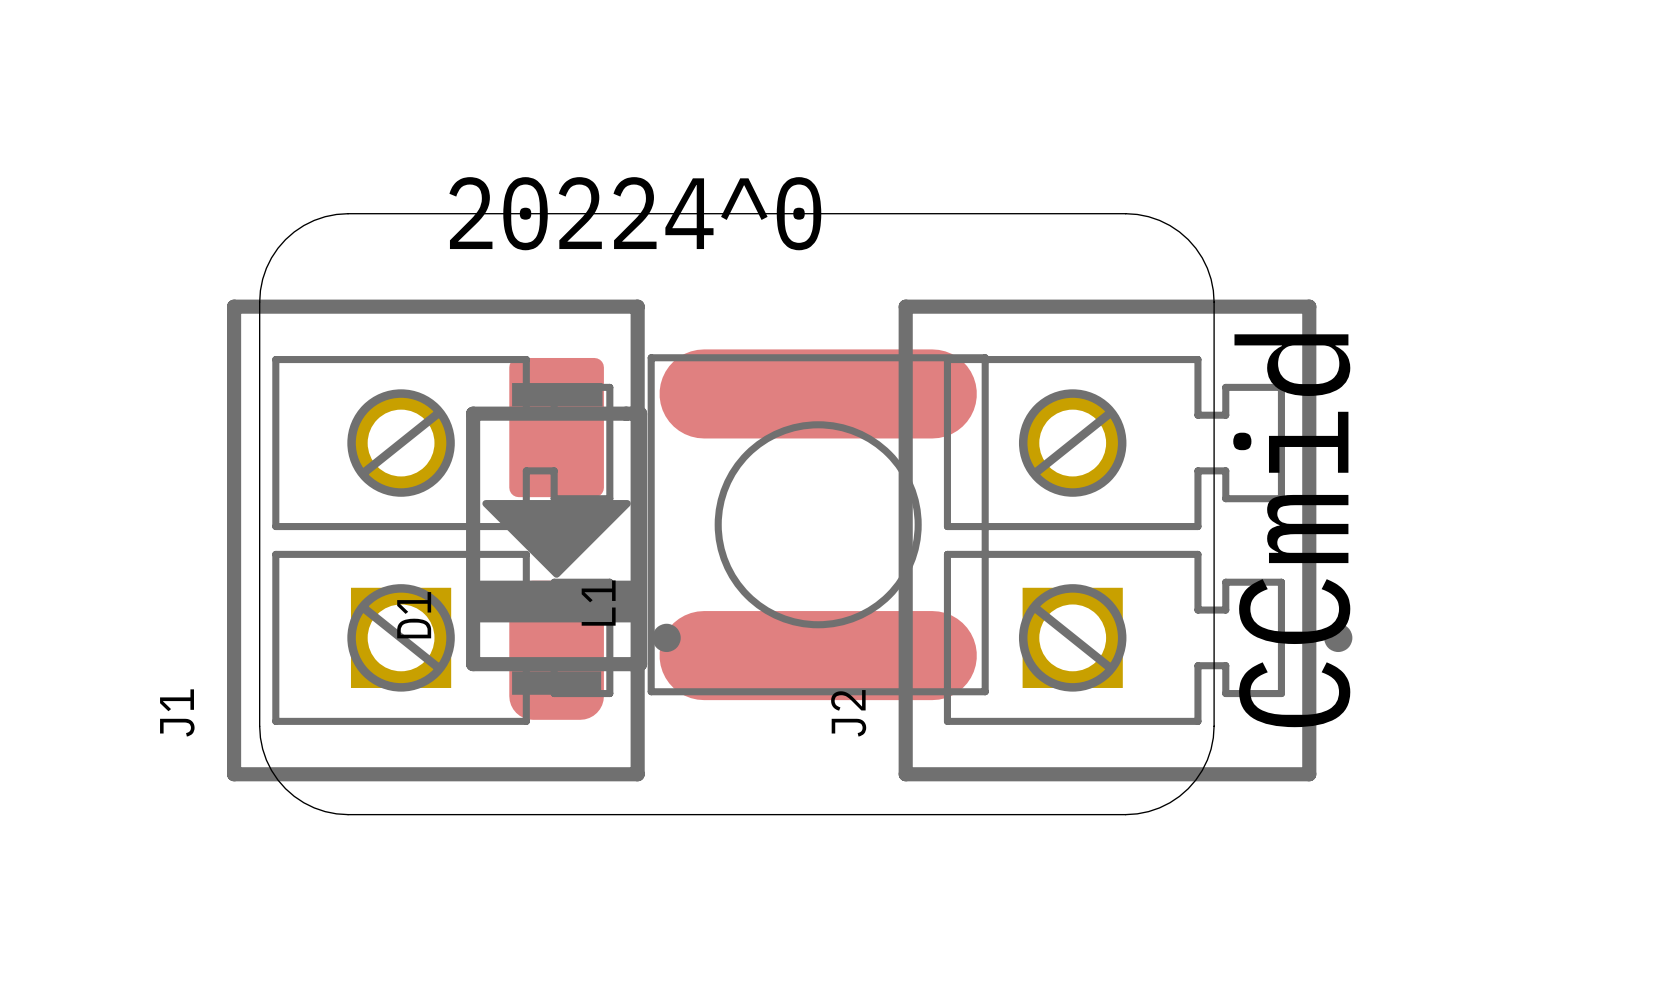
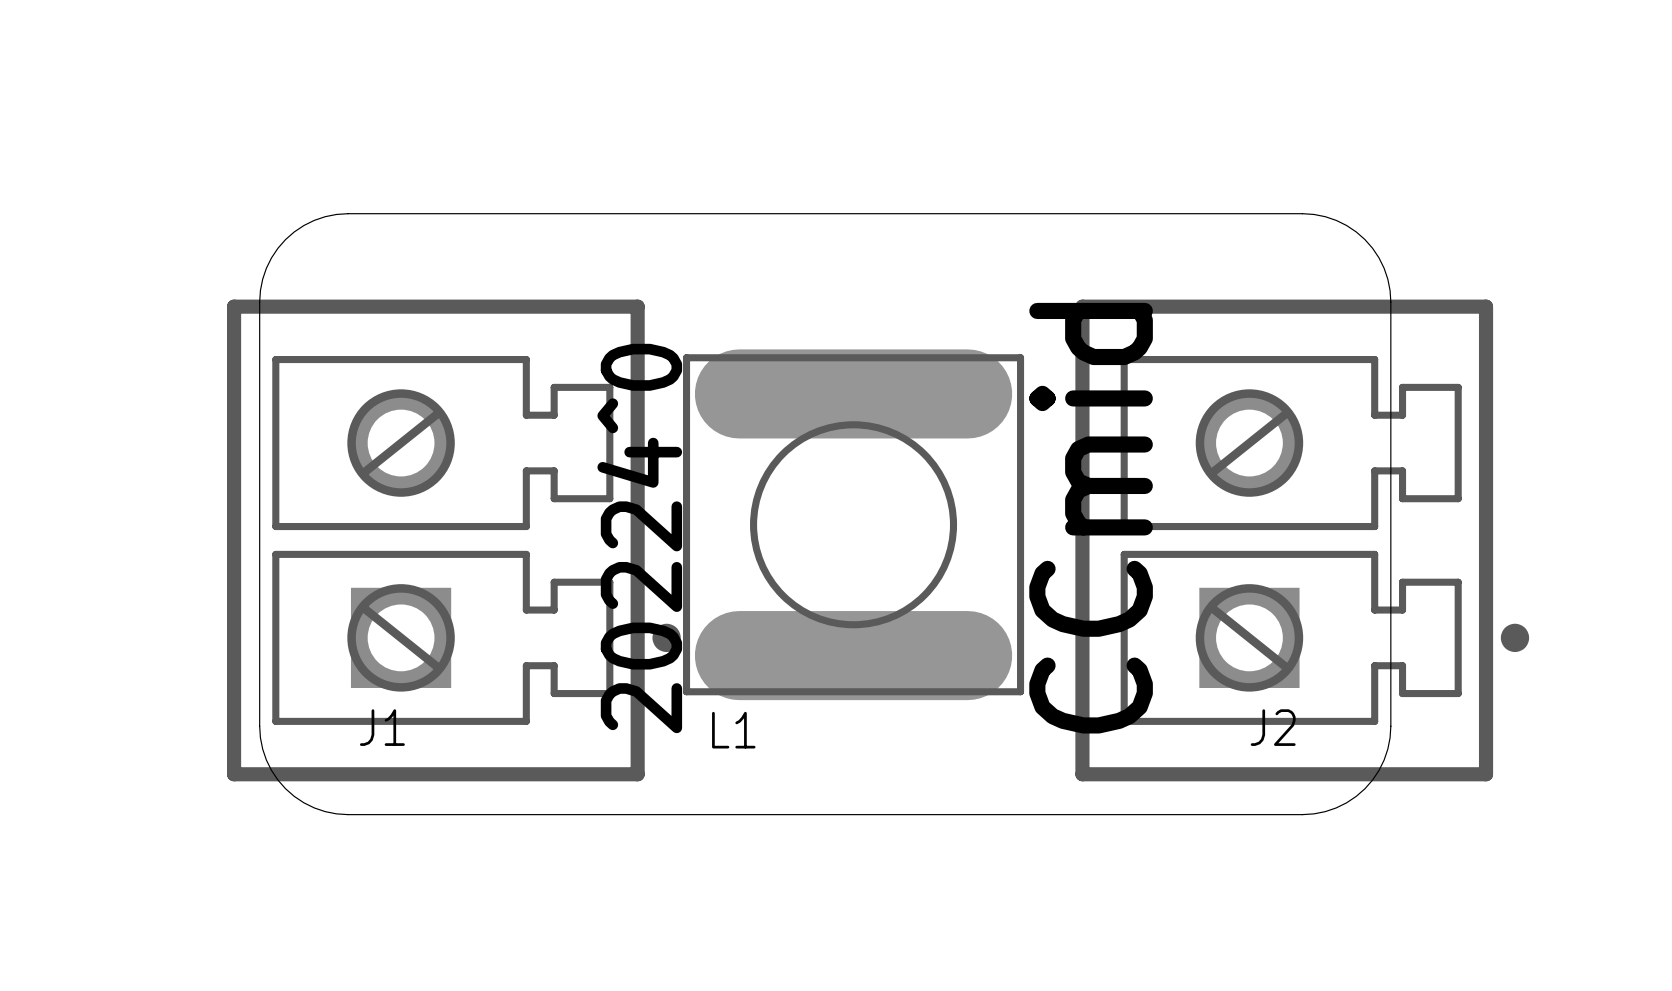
text rotation: 0° (635, 213) -> 90° counterclockwise (639, 538)
board edge: (1125, 213) (1148, 216) (1159, 220) (1169, 225) (1188, 239) (1195, 248) (1207, 268) (1211, 279) (1214, 302) (1213, 737) (1207, 760) (1202, 770) (1195, 780) (1179, 796) (1159, 807) (1148, 811) (1125, 814) -> (1125, 213) (1302, 213) (1325, 216) (1346, 225) (1364, 239) (1372, 248) (1384, 268) (1387, 279) (1390, 302) (1390, 726) (1387, 749) (1379, 770) (1364, 788) (1346, 802) (1336, 807) (1314, 813) (1125, 814)
L1 position: (818, 524) -> (853, 524)
text position: CCmid (1291, 530) -> CCmid (1091, 518)
D1: (556, 538) -> none
J2 position: (1125, 540) -> (1302, 540)
L1 name rotation: 0° (598, 603) -> 90° clockwise (733, 730)
L1 name position: L1 (598, 603) -> L1 (733, 730)
J1 name rotation: 0° (177, 712) -> 90° clockwise (382, 727)
J1 name position: J1 (177, 712) -> J1 (382, 727)
J2 name rotation: 0° (848, 713) -> 90° clockwise (1273, 727)
J2 name position: J2 (848, 713) -> J2 (1273, 727)

